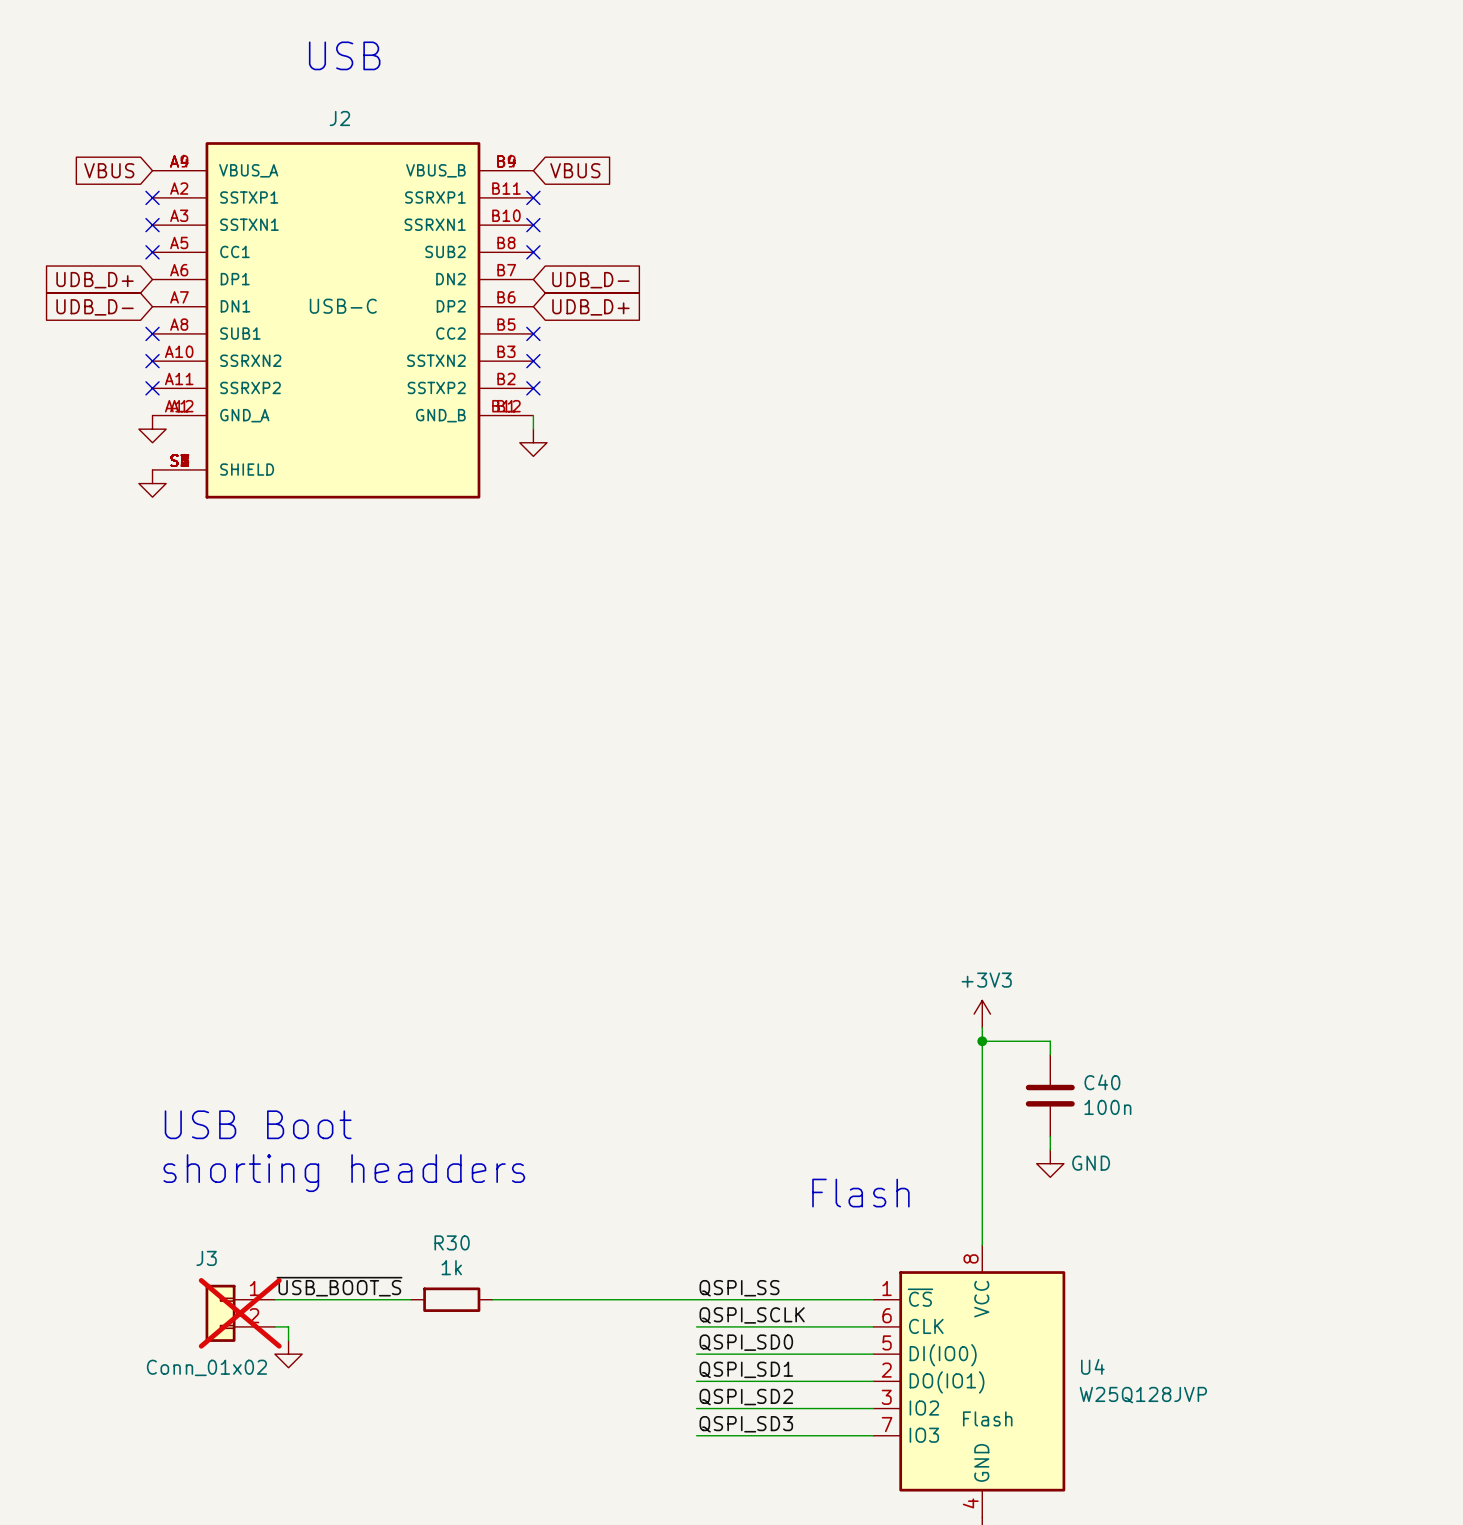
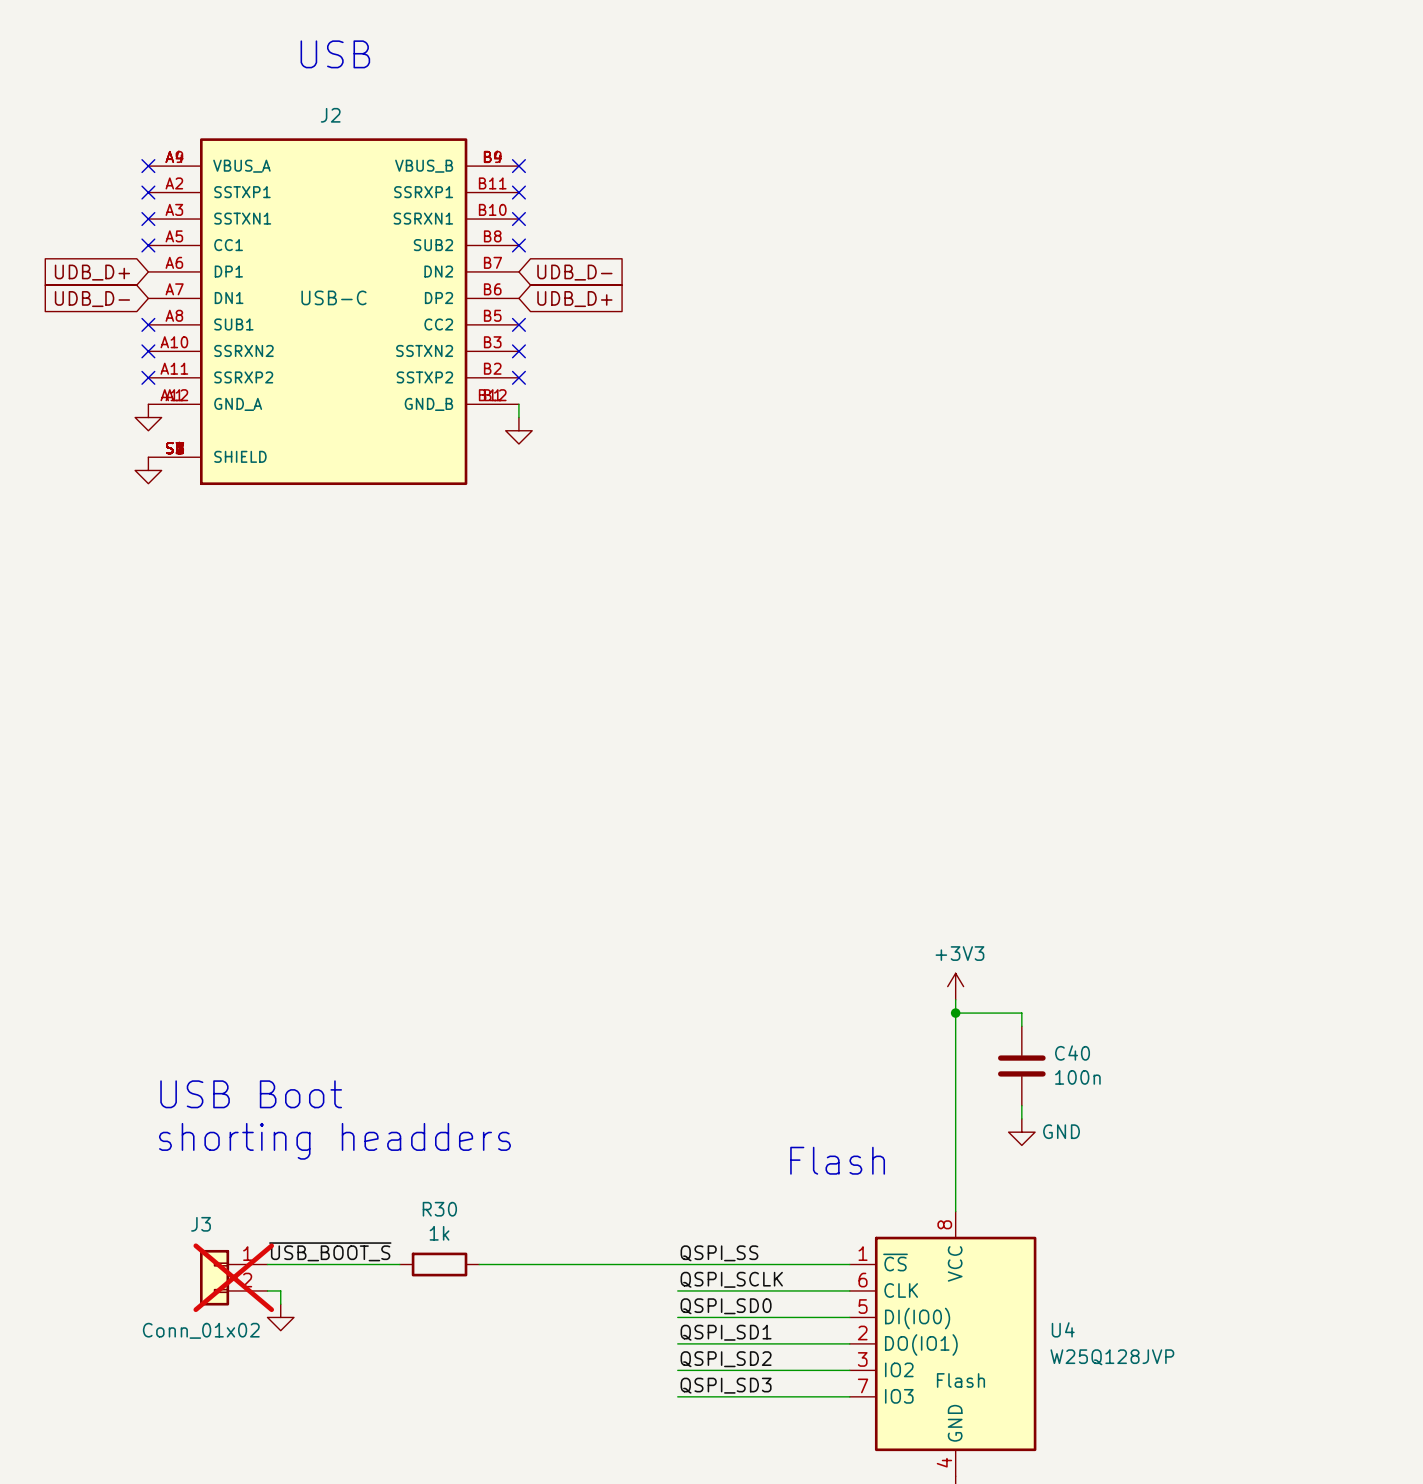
global label: VBUS (109, 170) -> none
no-connect mark: none -> (148, 166)
no-connect mark: none -> (518, 166)
global label: VBUS (575, 170) -> none

